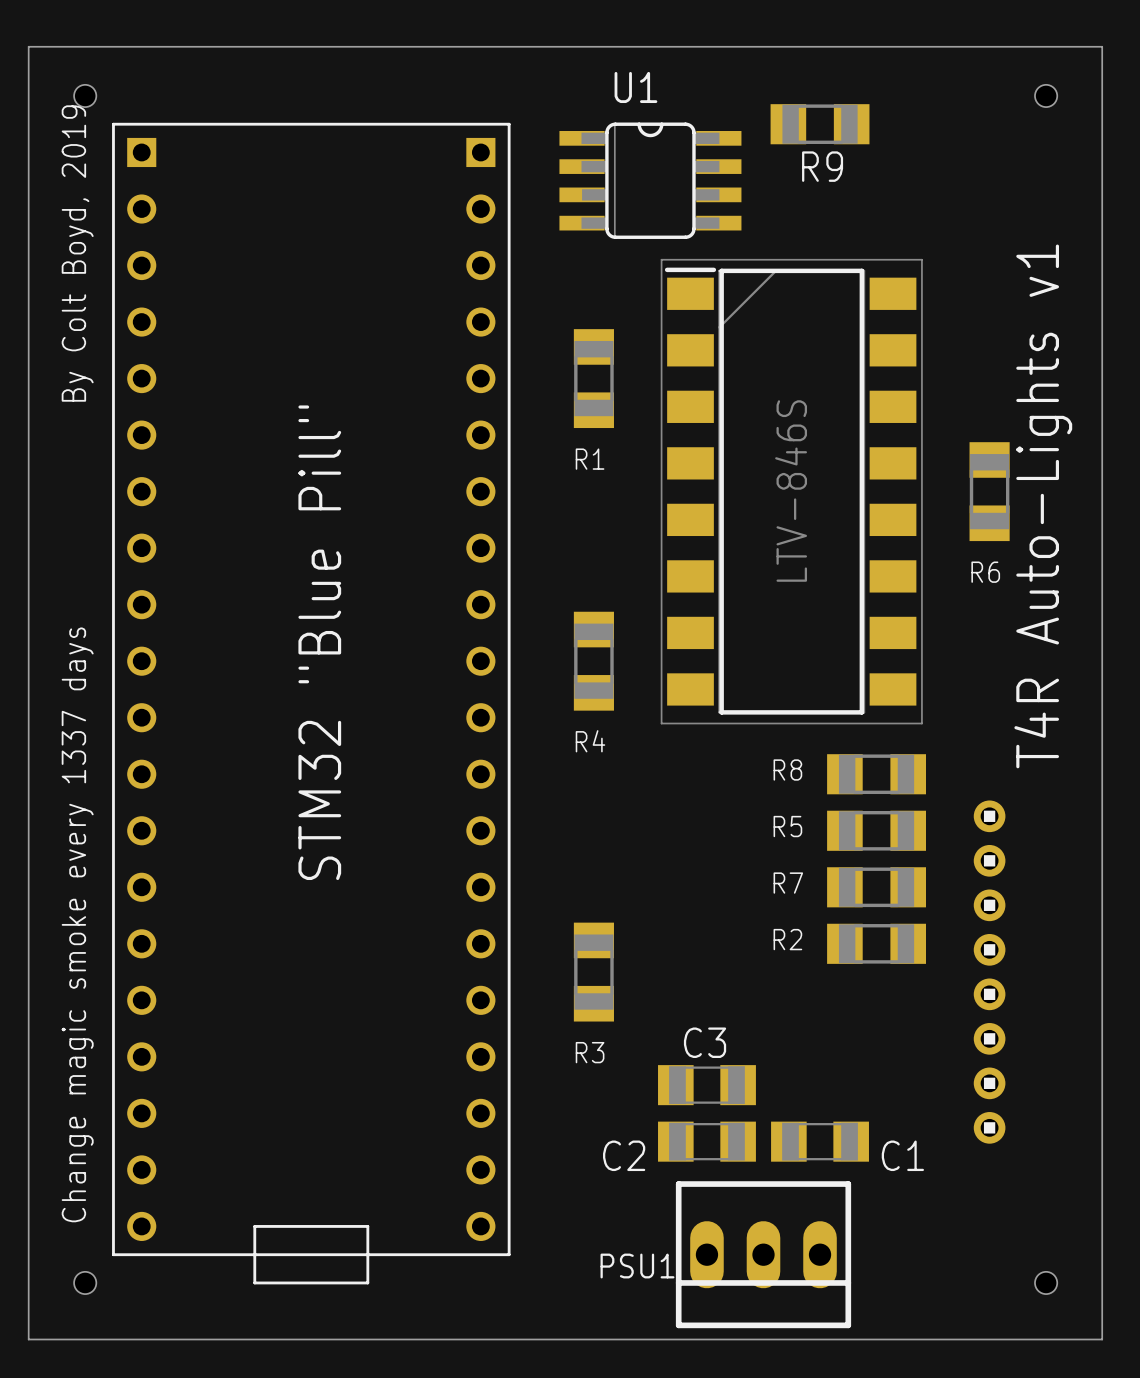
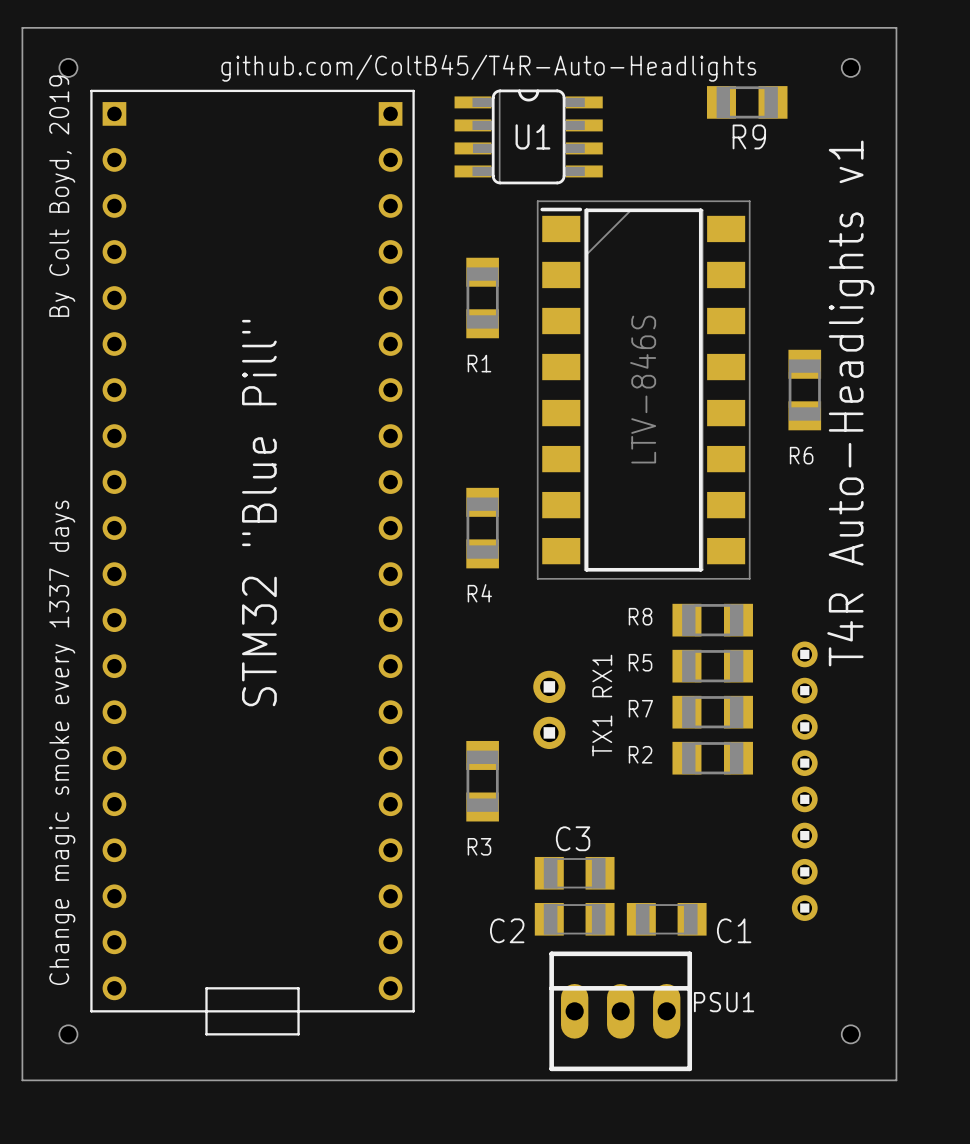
U1 name position: U1 (635, 87) -> U1 (532, 136)
text: none -> github.com/ColtB45/T4R-Auto-Headlights (488, 68)
R9 position: (820, 124) -> (747, 102)
text: T4R Auto-Lights v1 (1043, 506) -> T4R Auto-Headlights v1 (850, 403)
text: none -> TX1 RX1 (602, 705)
part: none -> (549, 709)
PSU1 rotation: 0° (763, 1254) -> 180° (620, 1011)

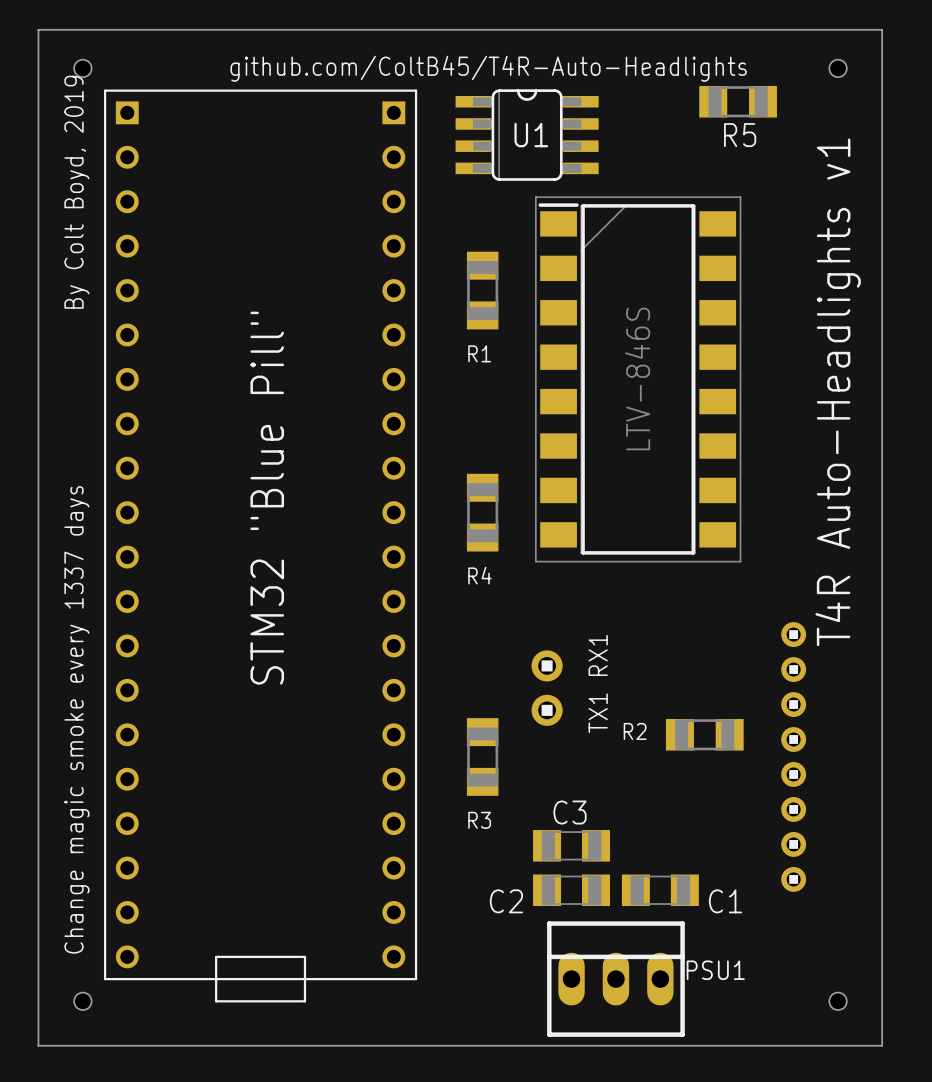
R9 name: R9 (749, 136) -> R5 (740, 135)
R6: (804, 390) -> none
R8: (712, 620) -> none
R5: (712, 666) -> none
R7: (712, 712) -> none

